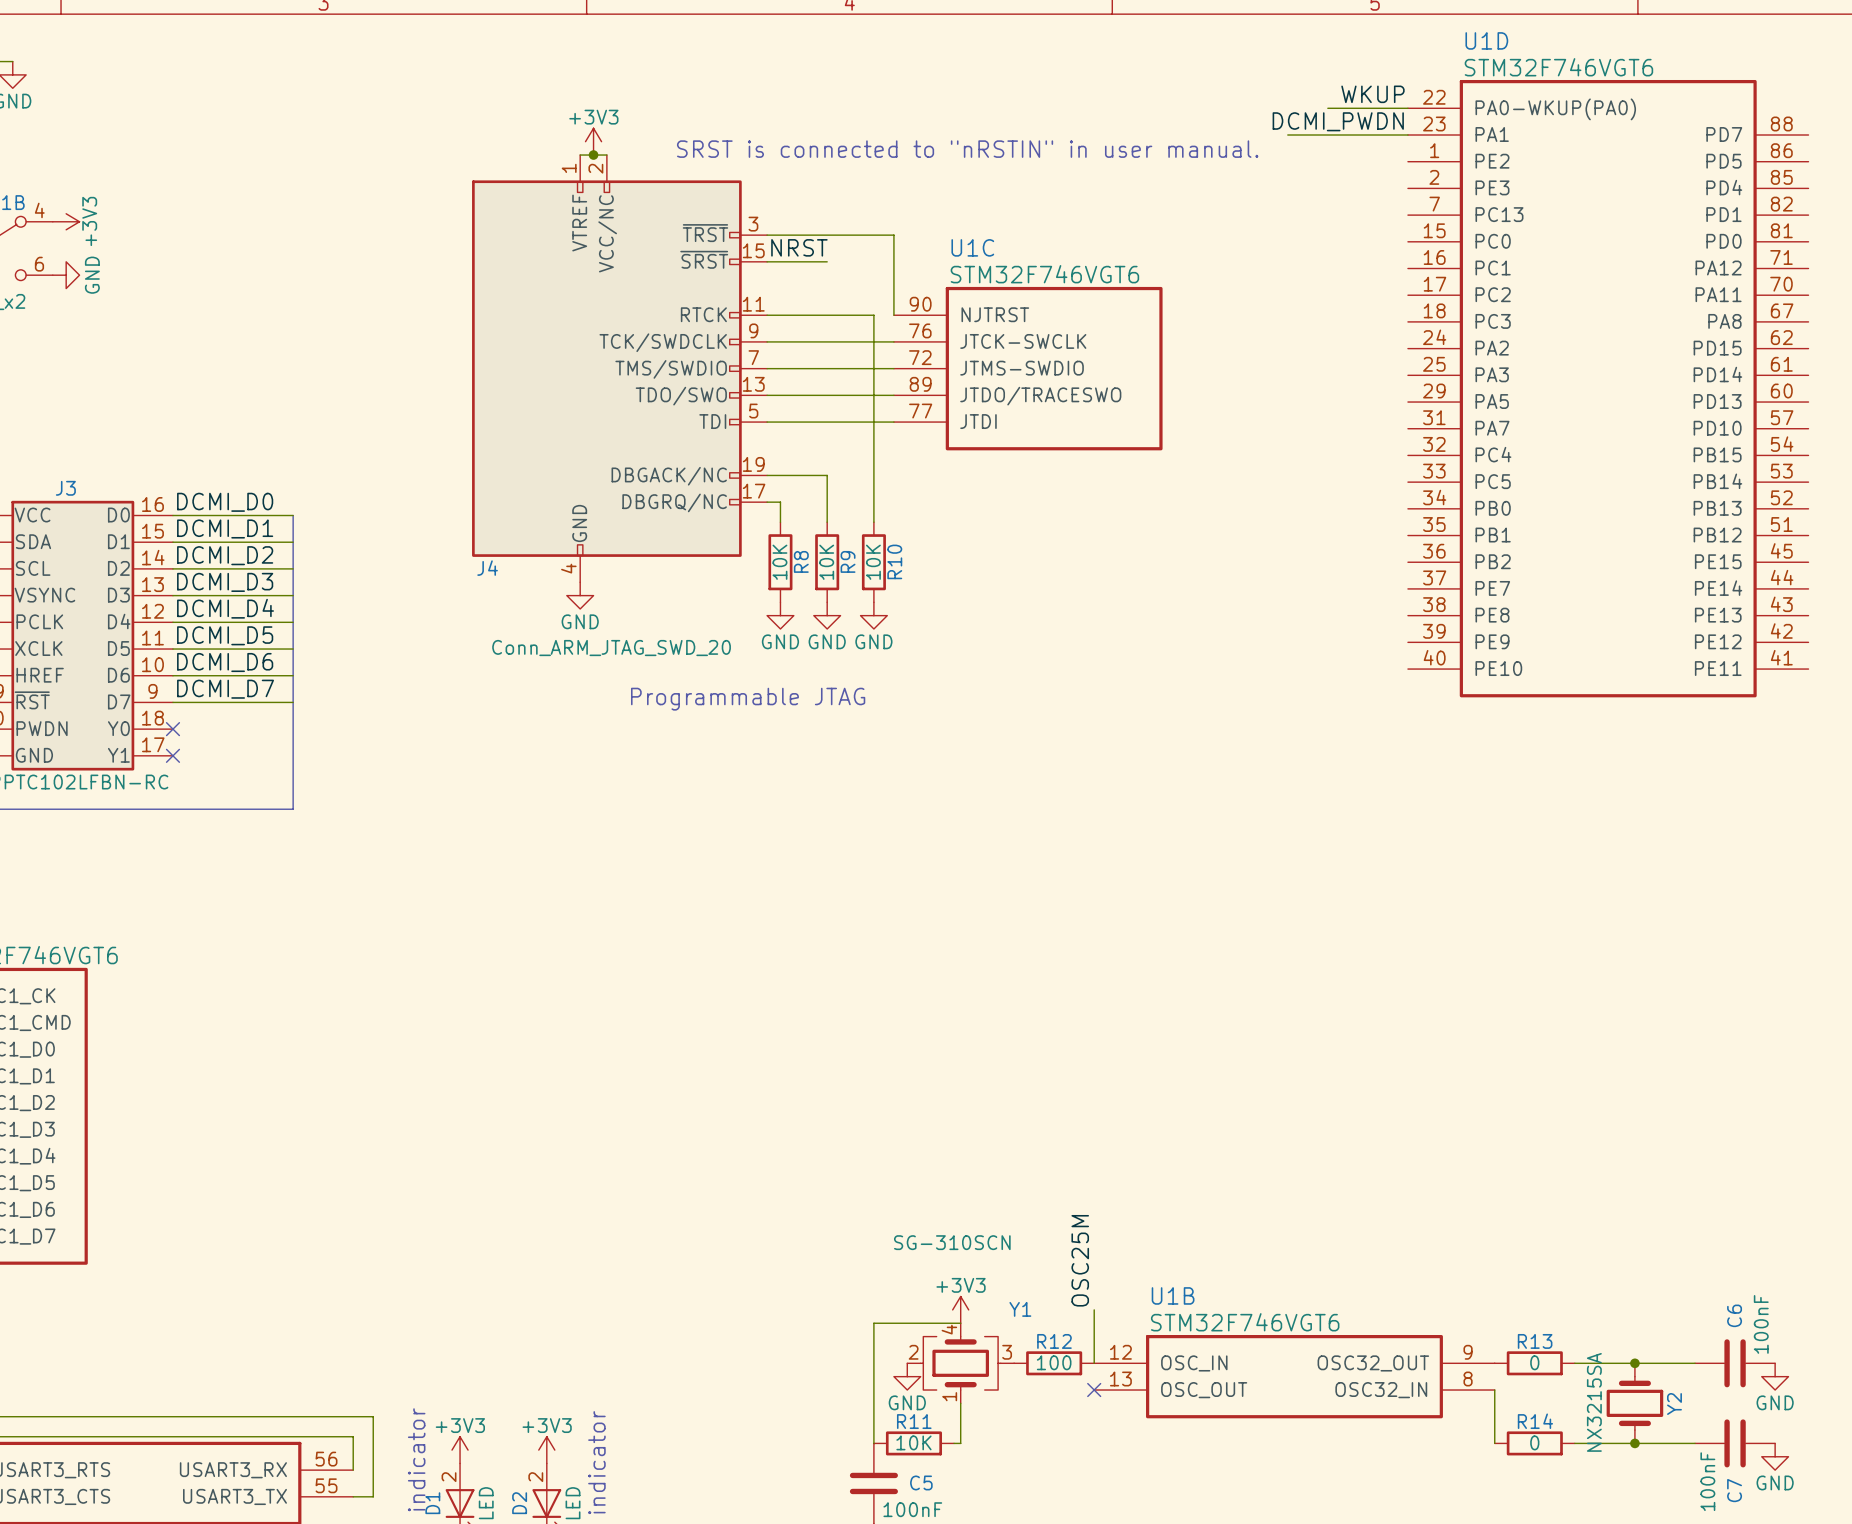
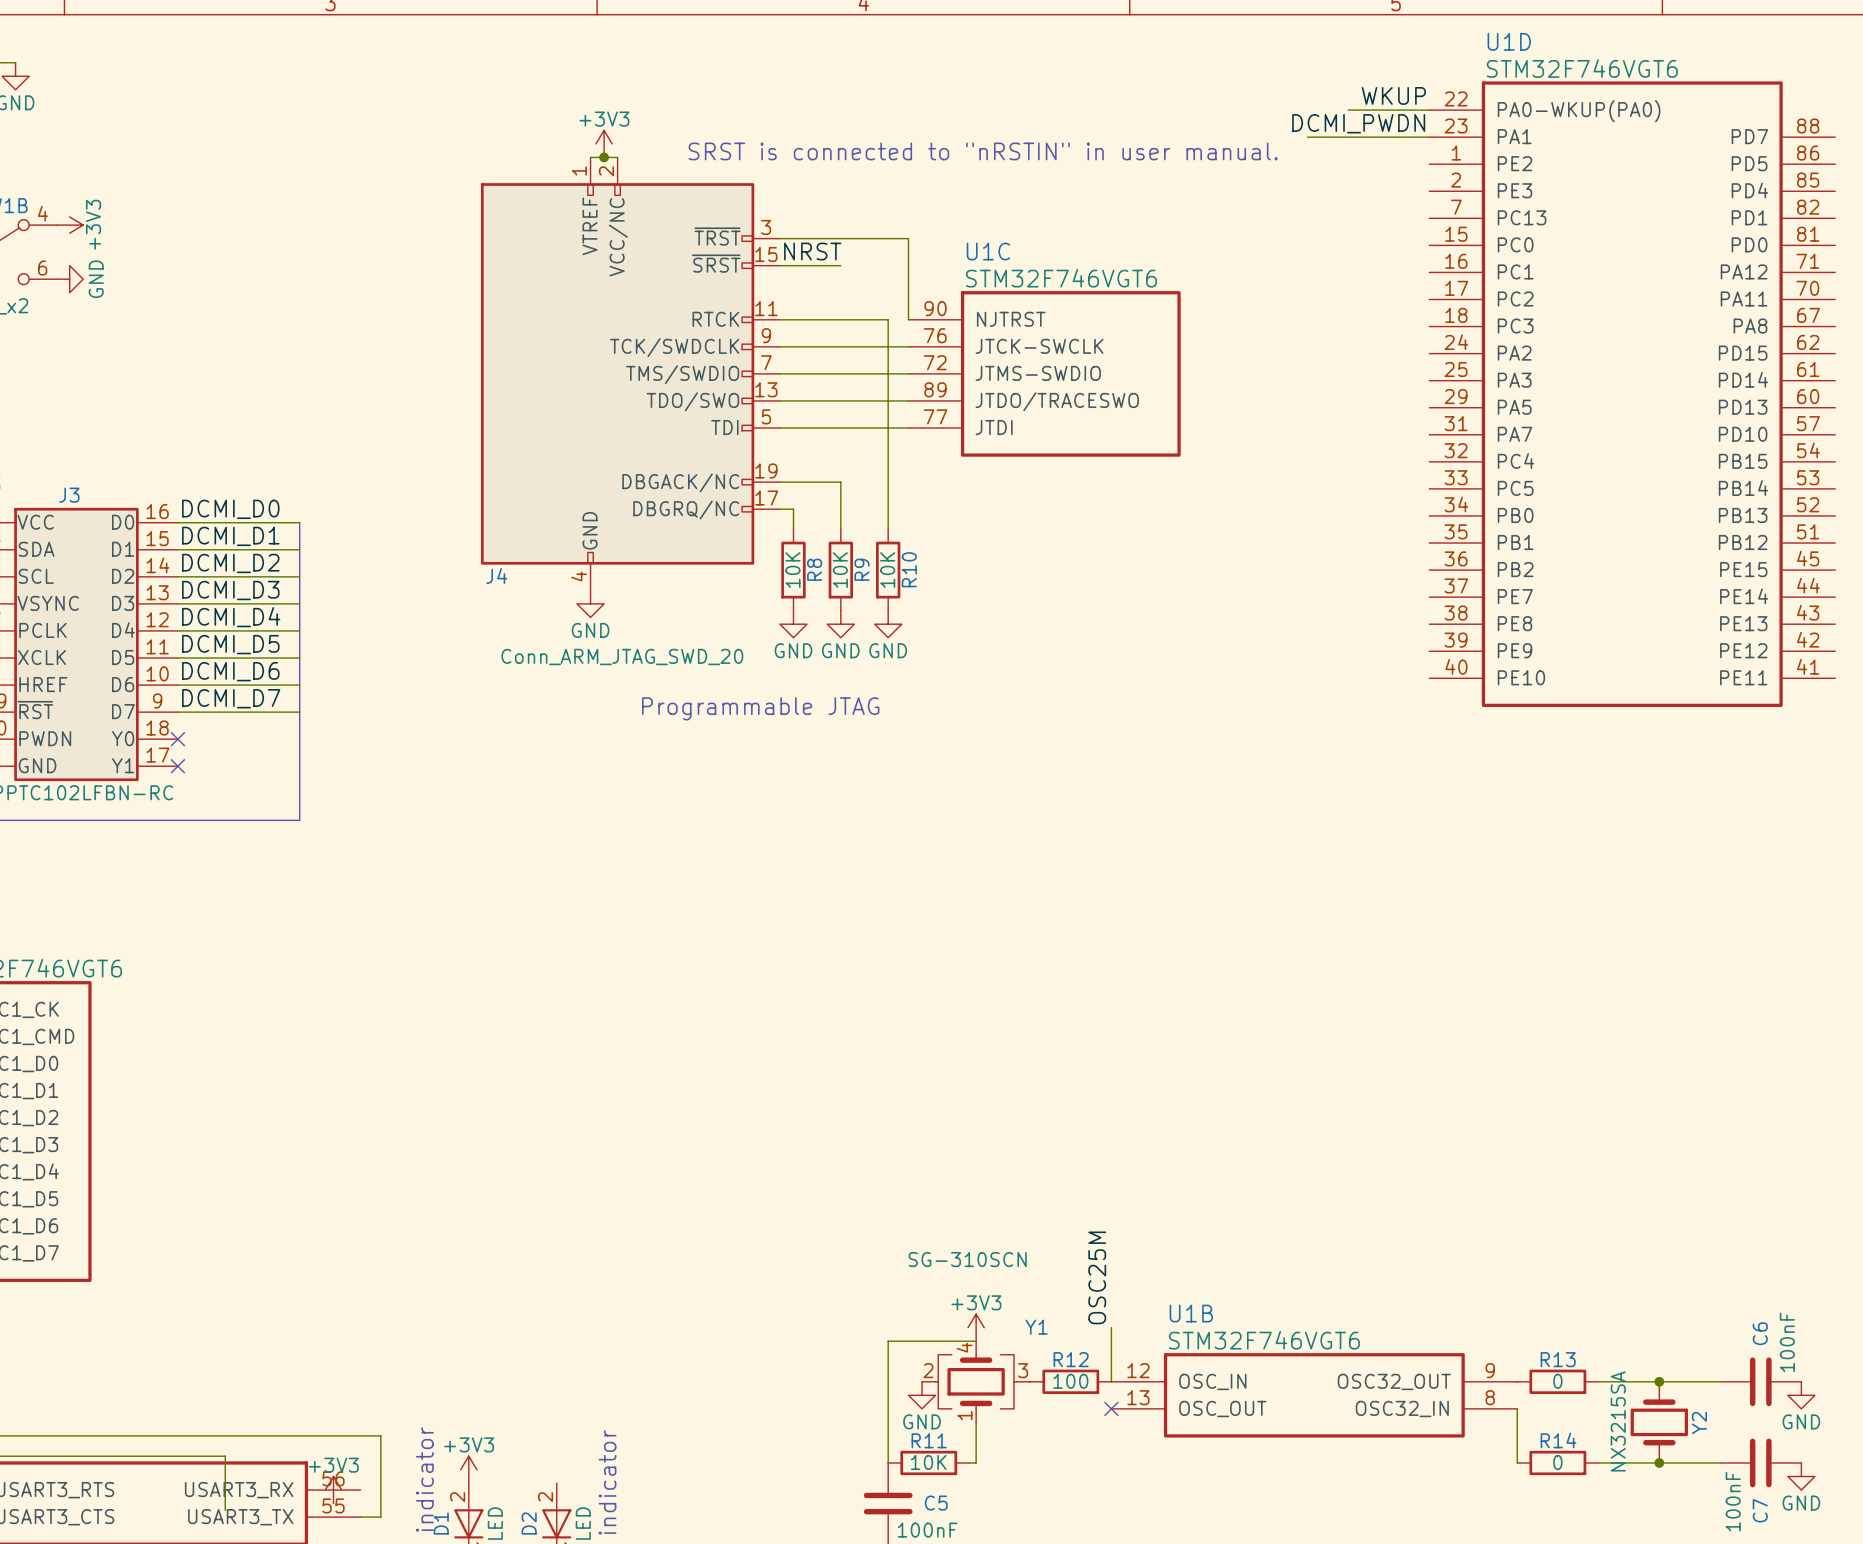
wire: (219, 1436) (353, 1436) (353, 1470) -> (225, 1456) (225, 1510)
power symbol position: +3V3 (546, 1450) -> +3V3 (333, 1490)

